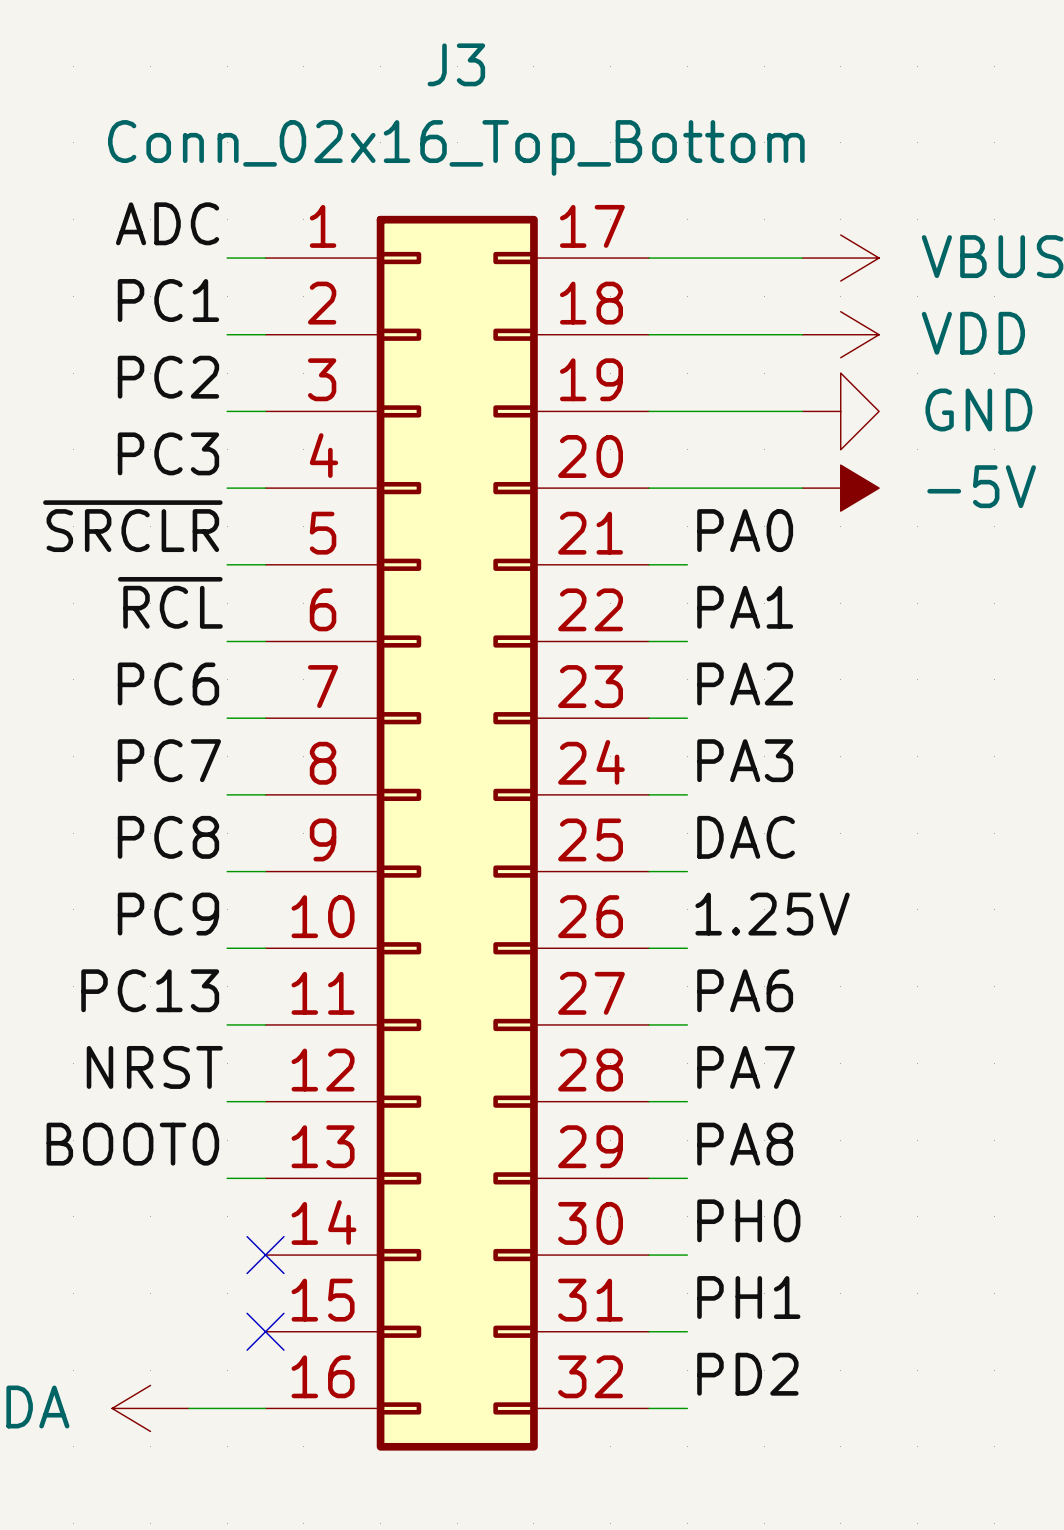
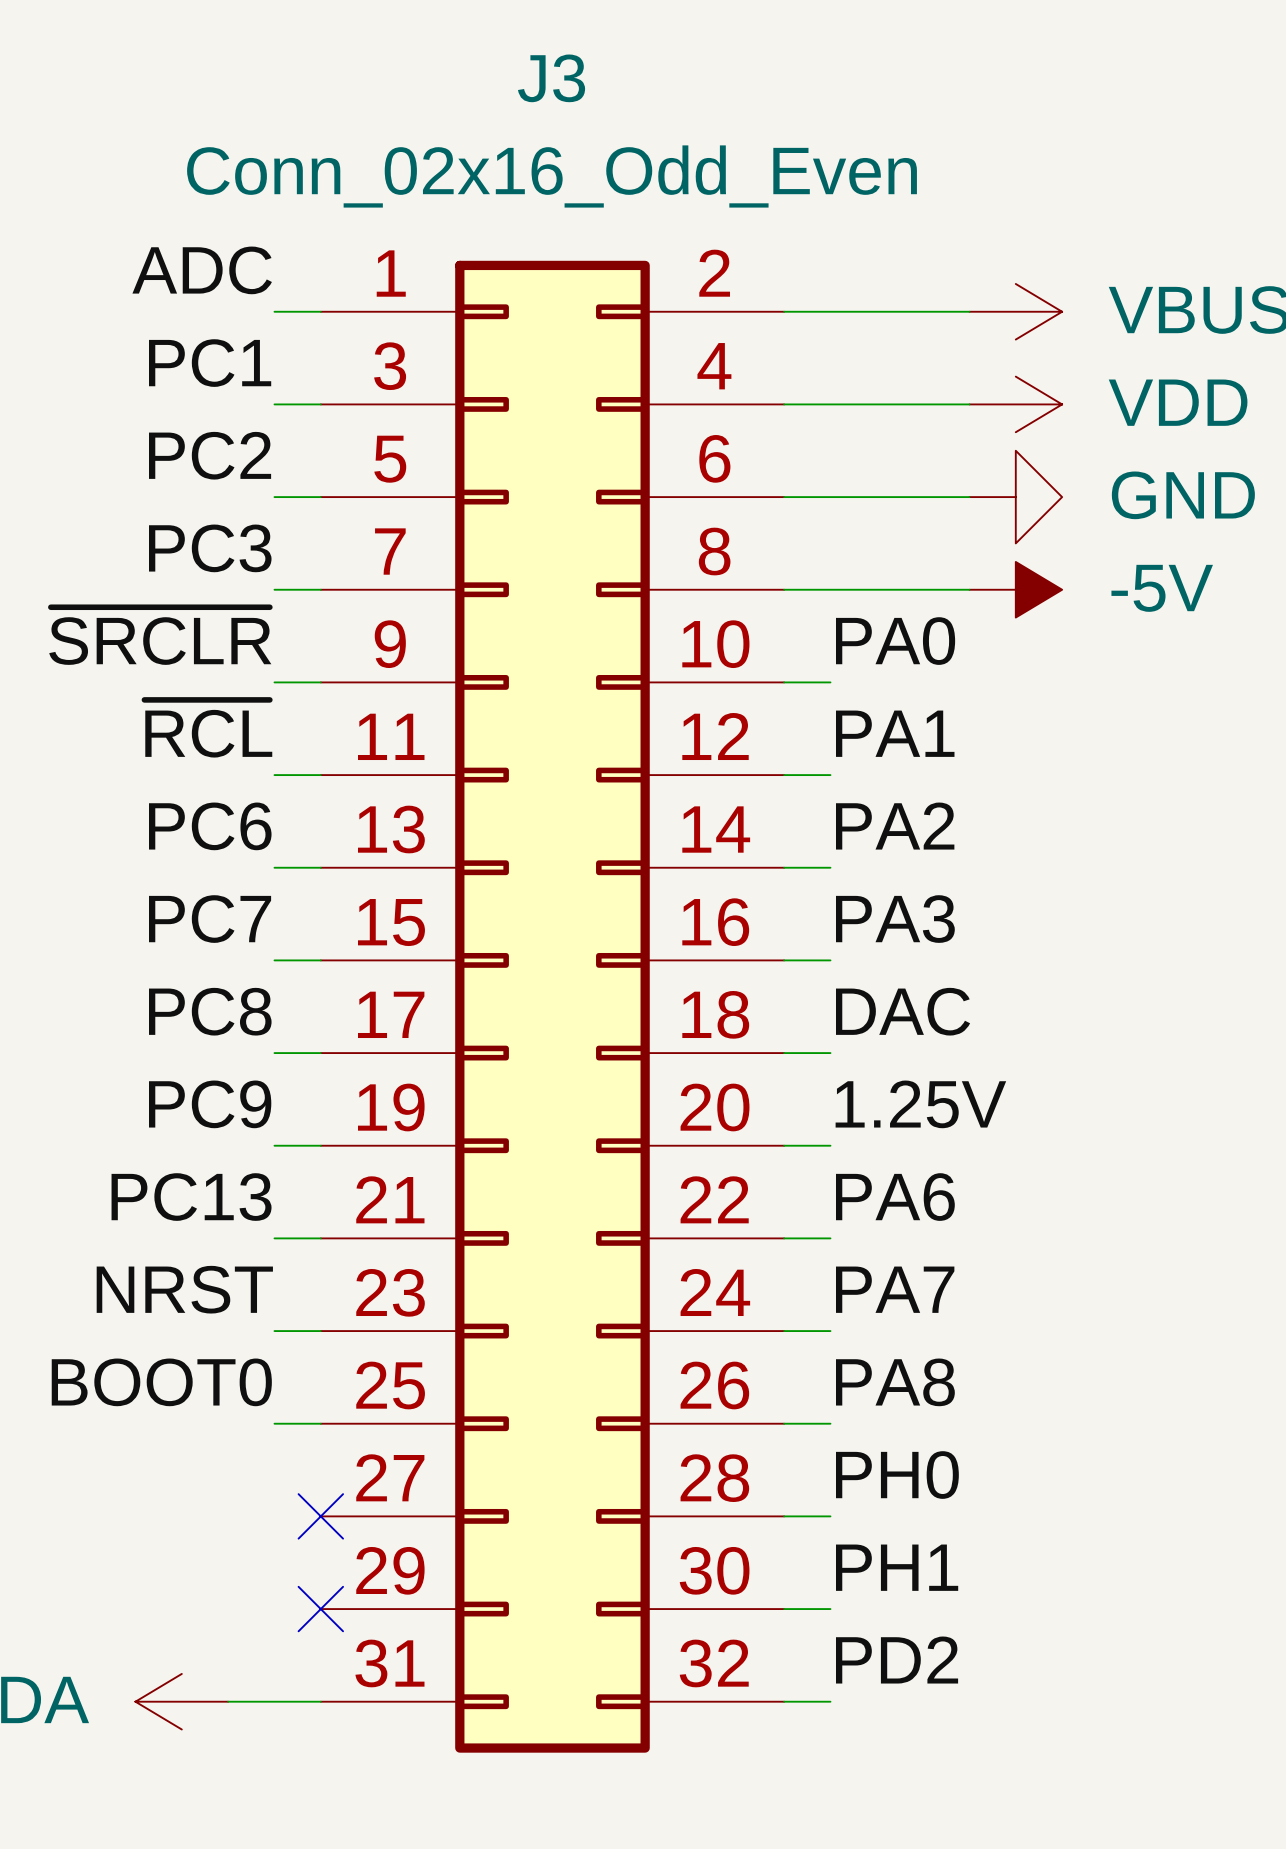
J3 value: Conn_02x16_Top_Bottom (456, 147) -> Conn_02x16_Odd_Even (552, 176)
J3 symbol: [265, 215, 650, 1451] -> [320, 260, 785, 1753]

